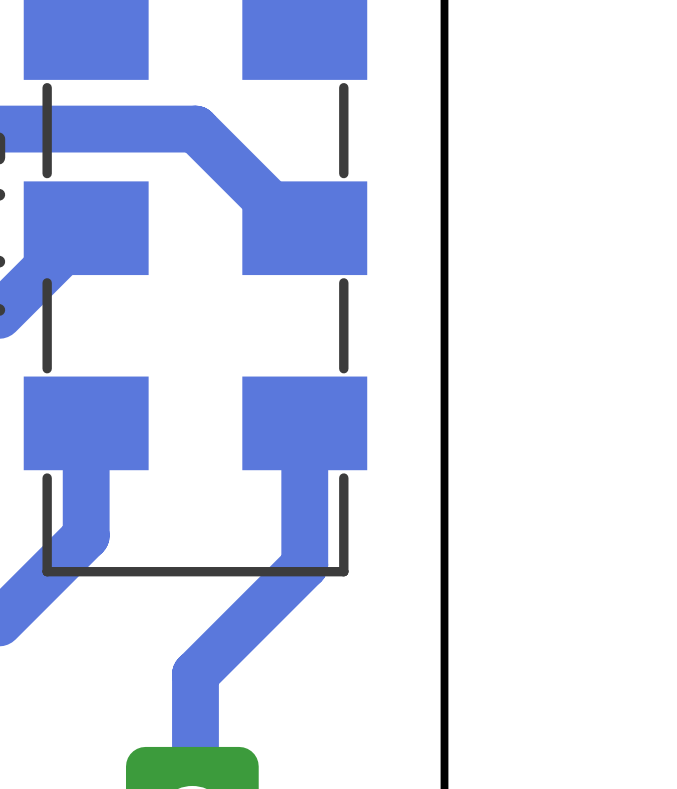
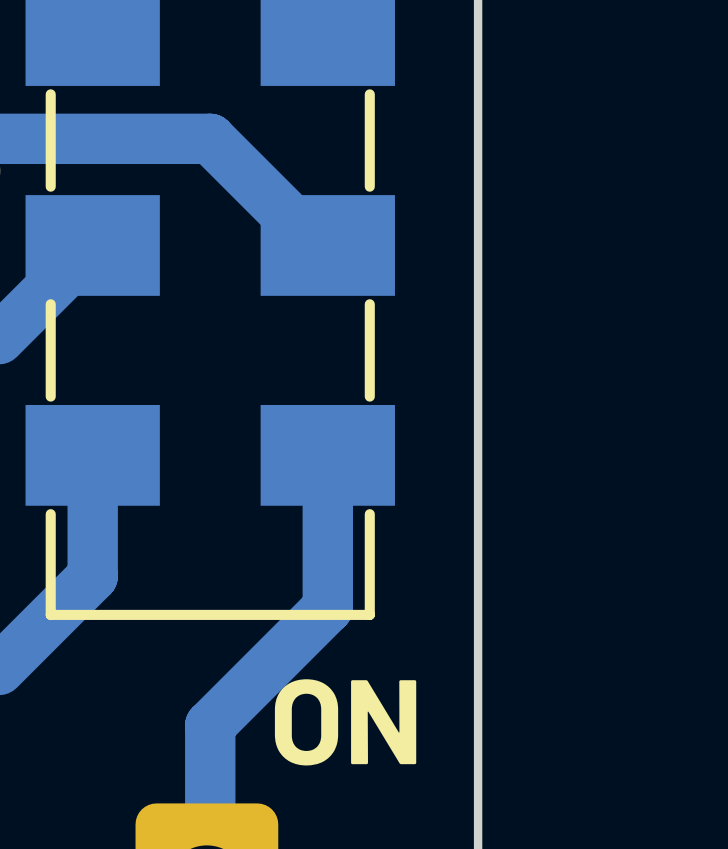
text: none -> ON (345, 722)

